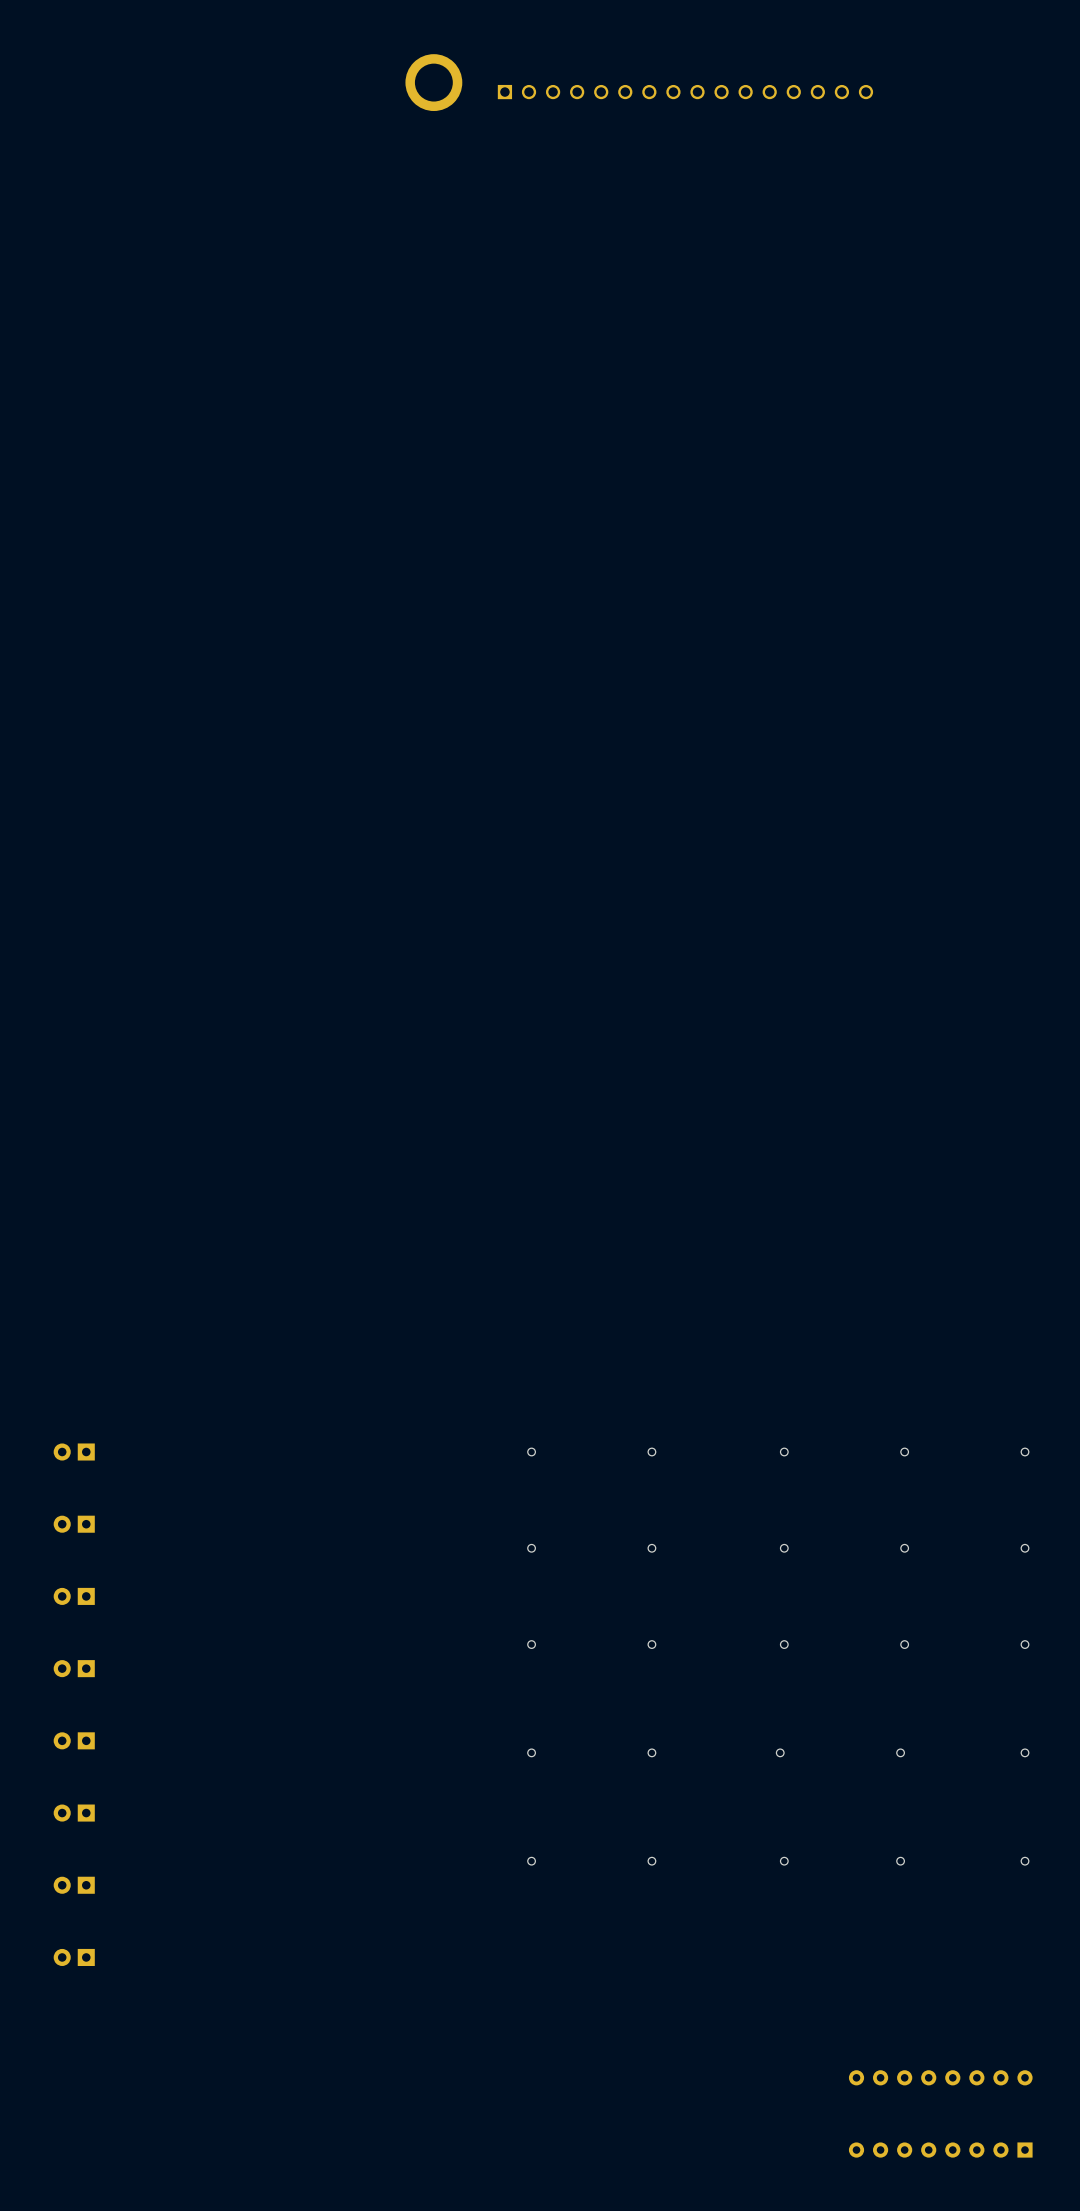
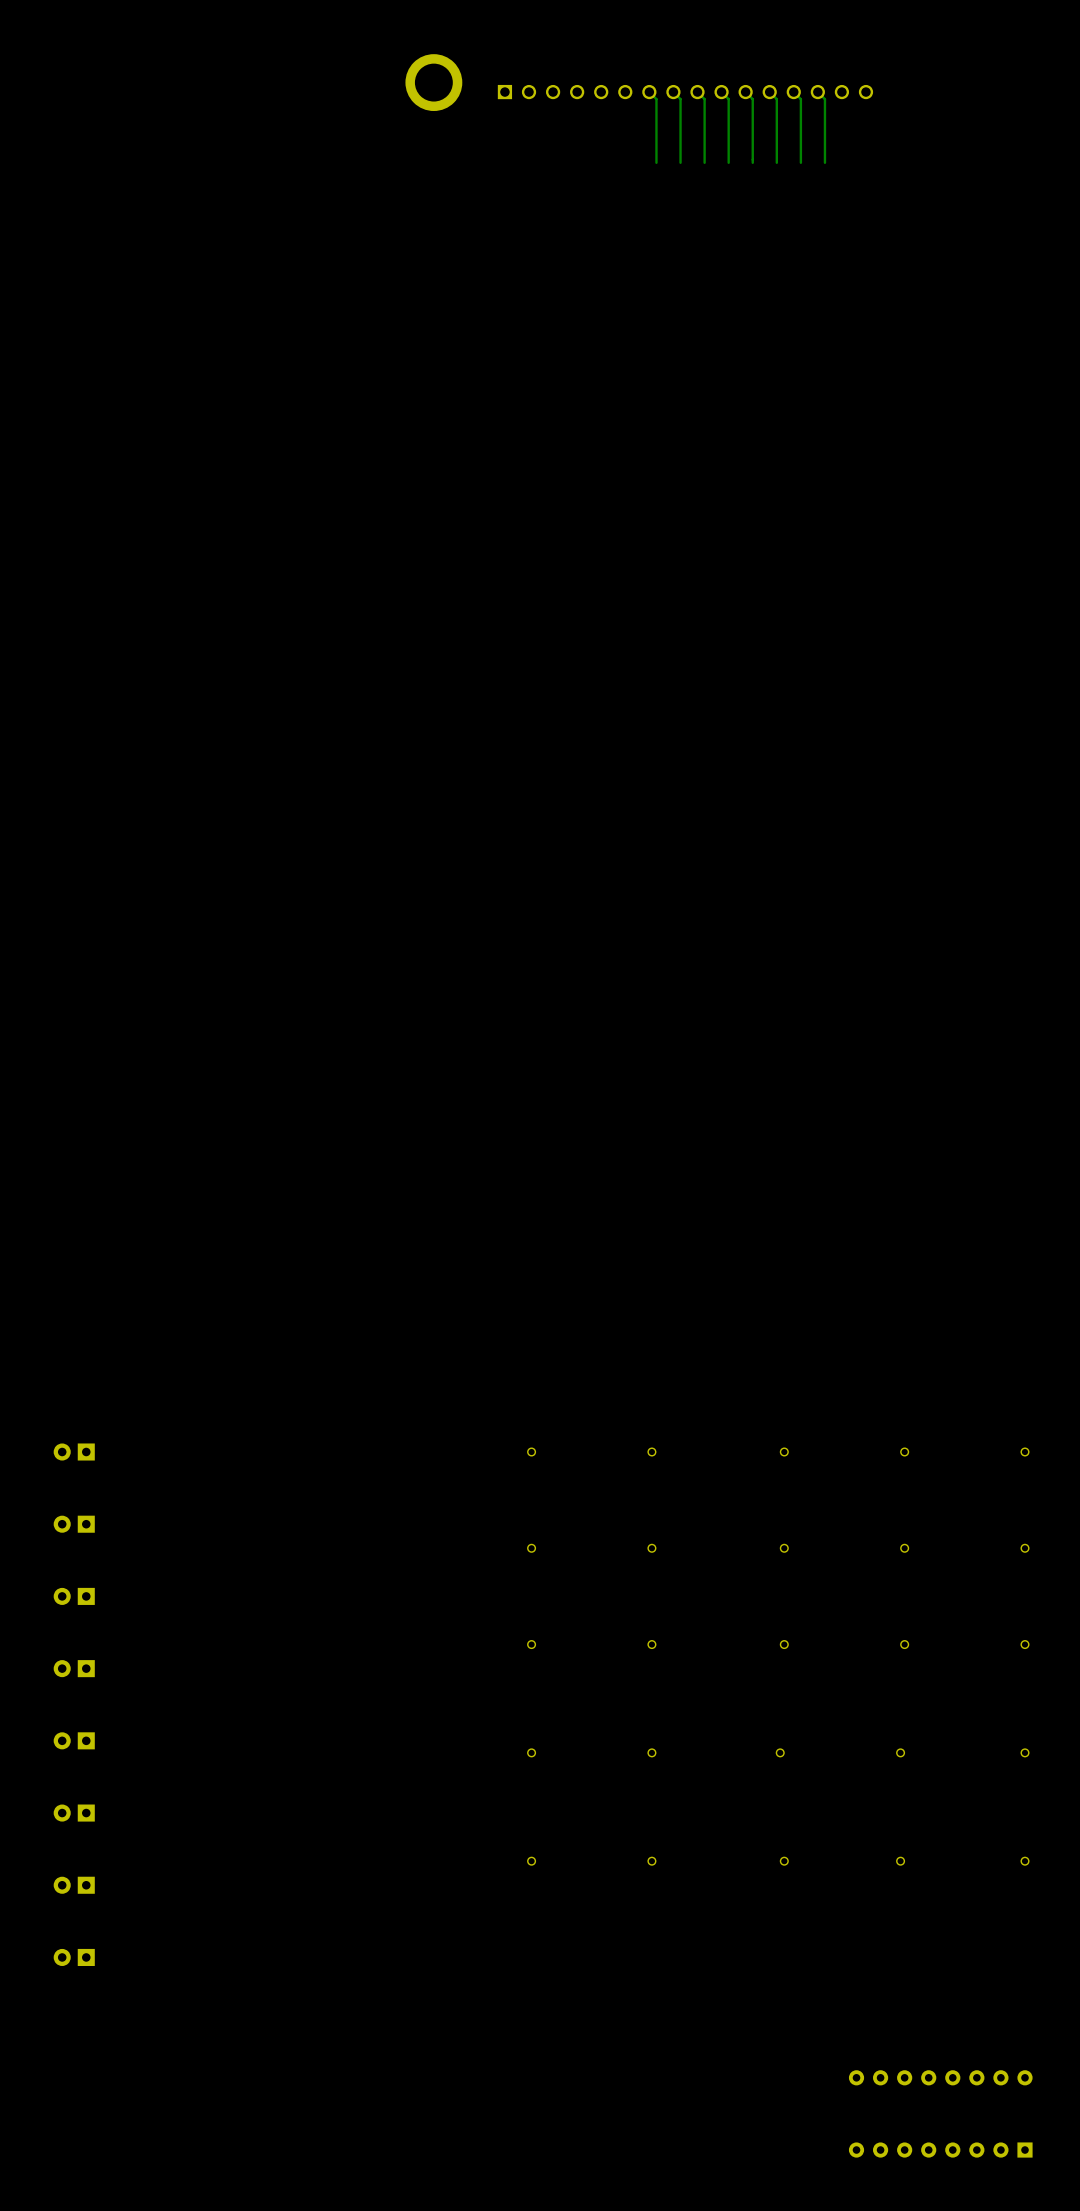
track: none -> (649, 92) (656, 99) (656, 162)
track: none -> (673, 92) (680, 99) (680, 162)
track: none -> (697, 92) (704, 99) (704, 162)
track: none -> (721, 92) (728, 99) (728, 162)
track: none -> (745, 92) (752, 99) (752, 162)
track: none -> (769, 92) (776, 99) (776, 162)
track: none -> (793, 92) (800, 99) (800, 162)
track: none -> (817, 92) (824, 99) (824, 162)

